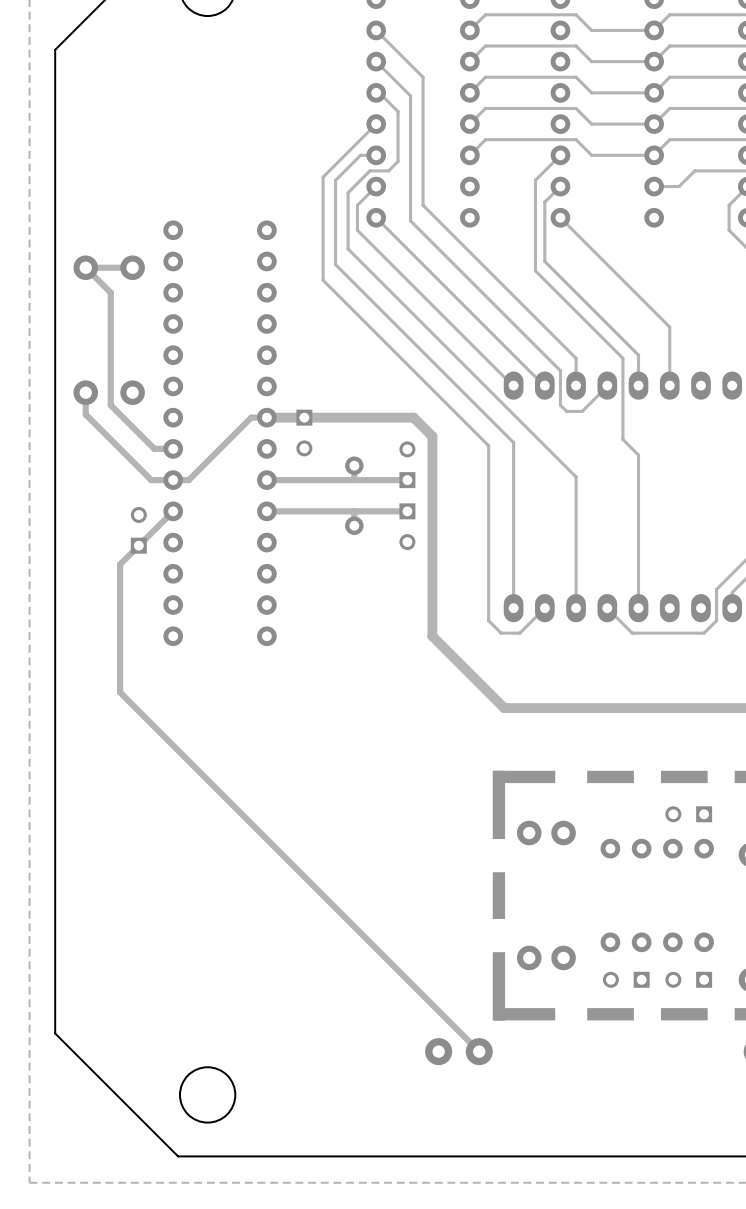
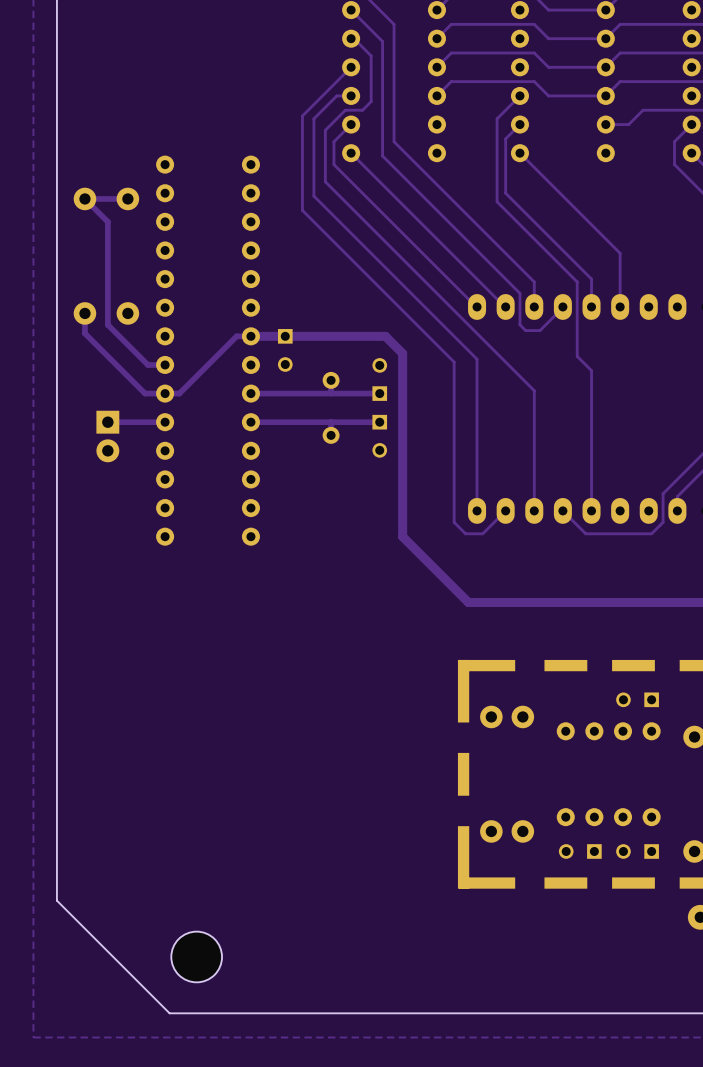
track: (173, 511) (120, 564) (120, 692) (479, 1051) -> (165, 422) (107, 422)
part: none -> (107, 436)
part: (138, 530) -> none
part: (438, 1051) -> none
part: (479, 1051) -> none

